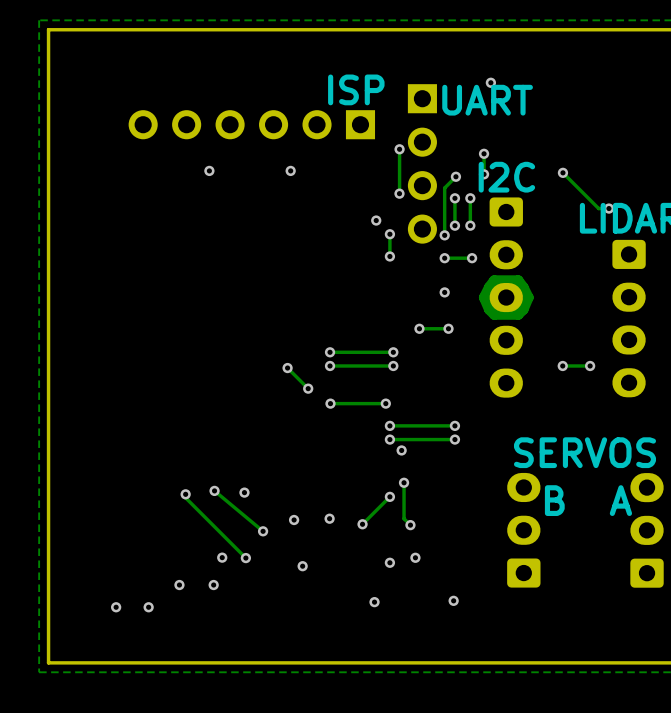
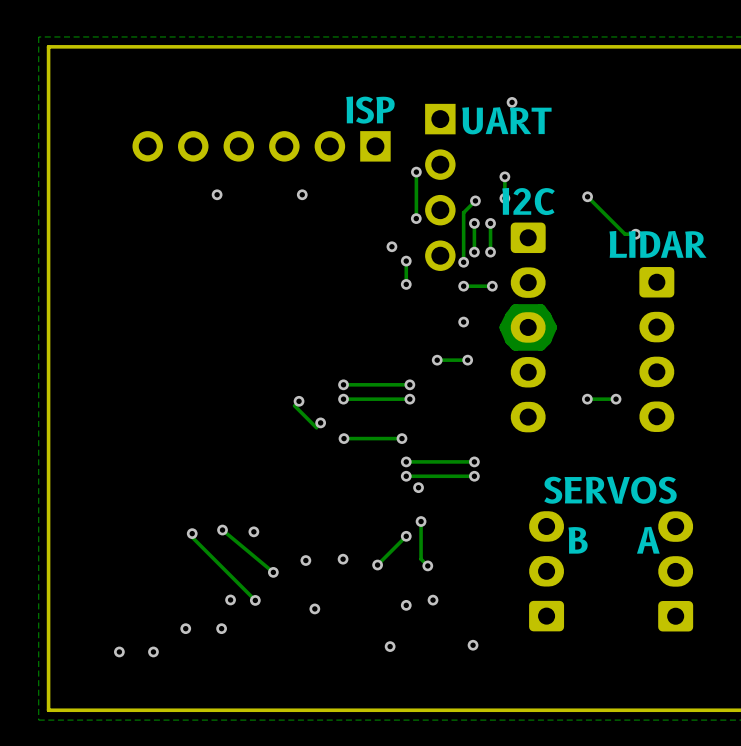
track: (287, 368) (308, 388) -> none
track: none -> (294, 405) (316, 427)

